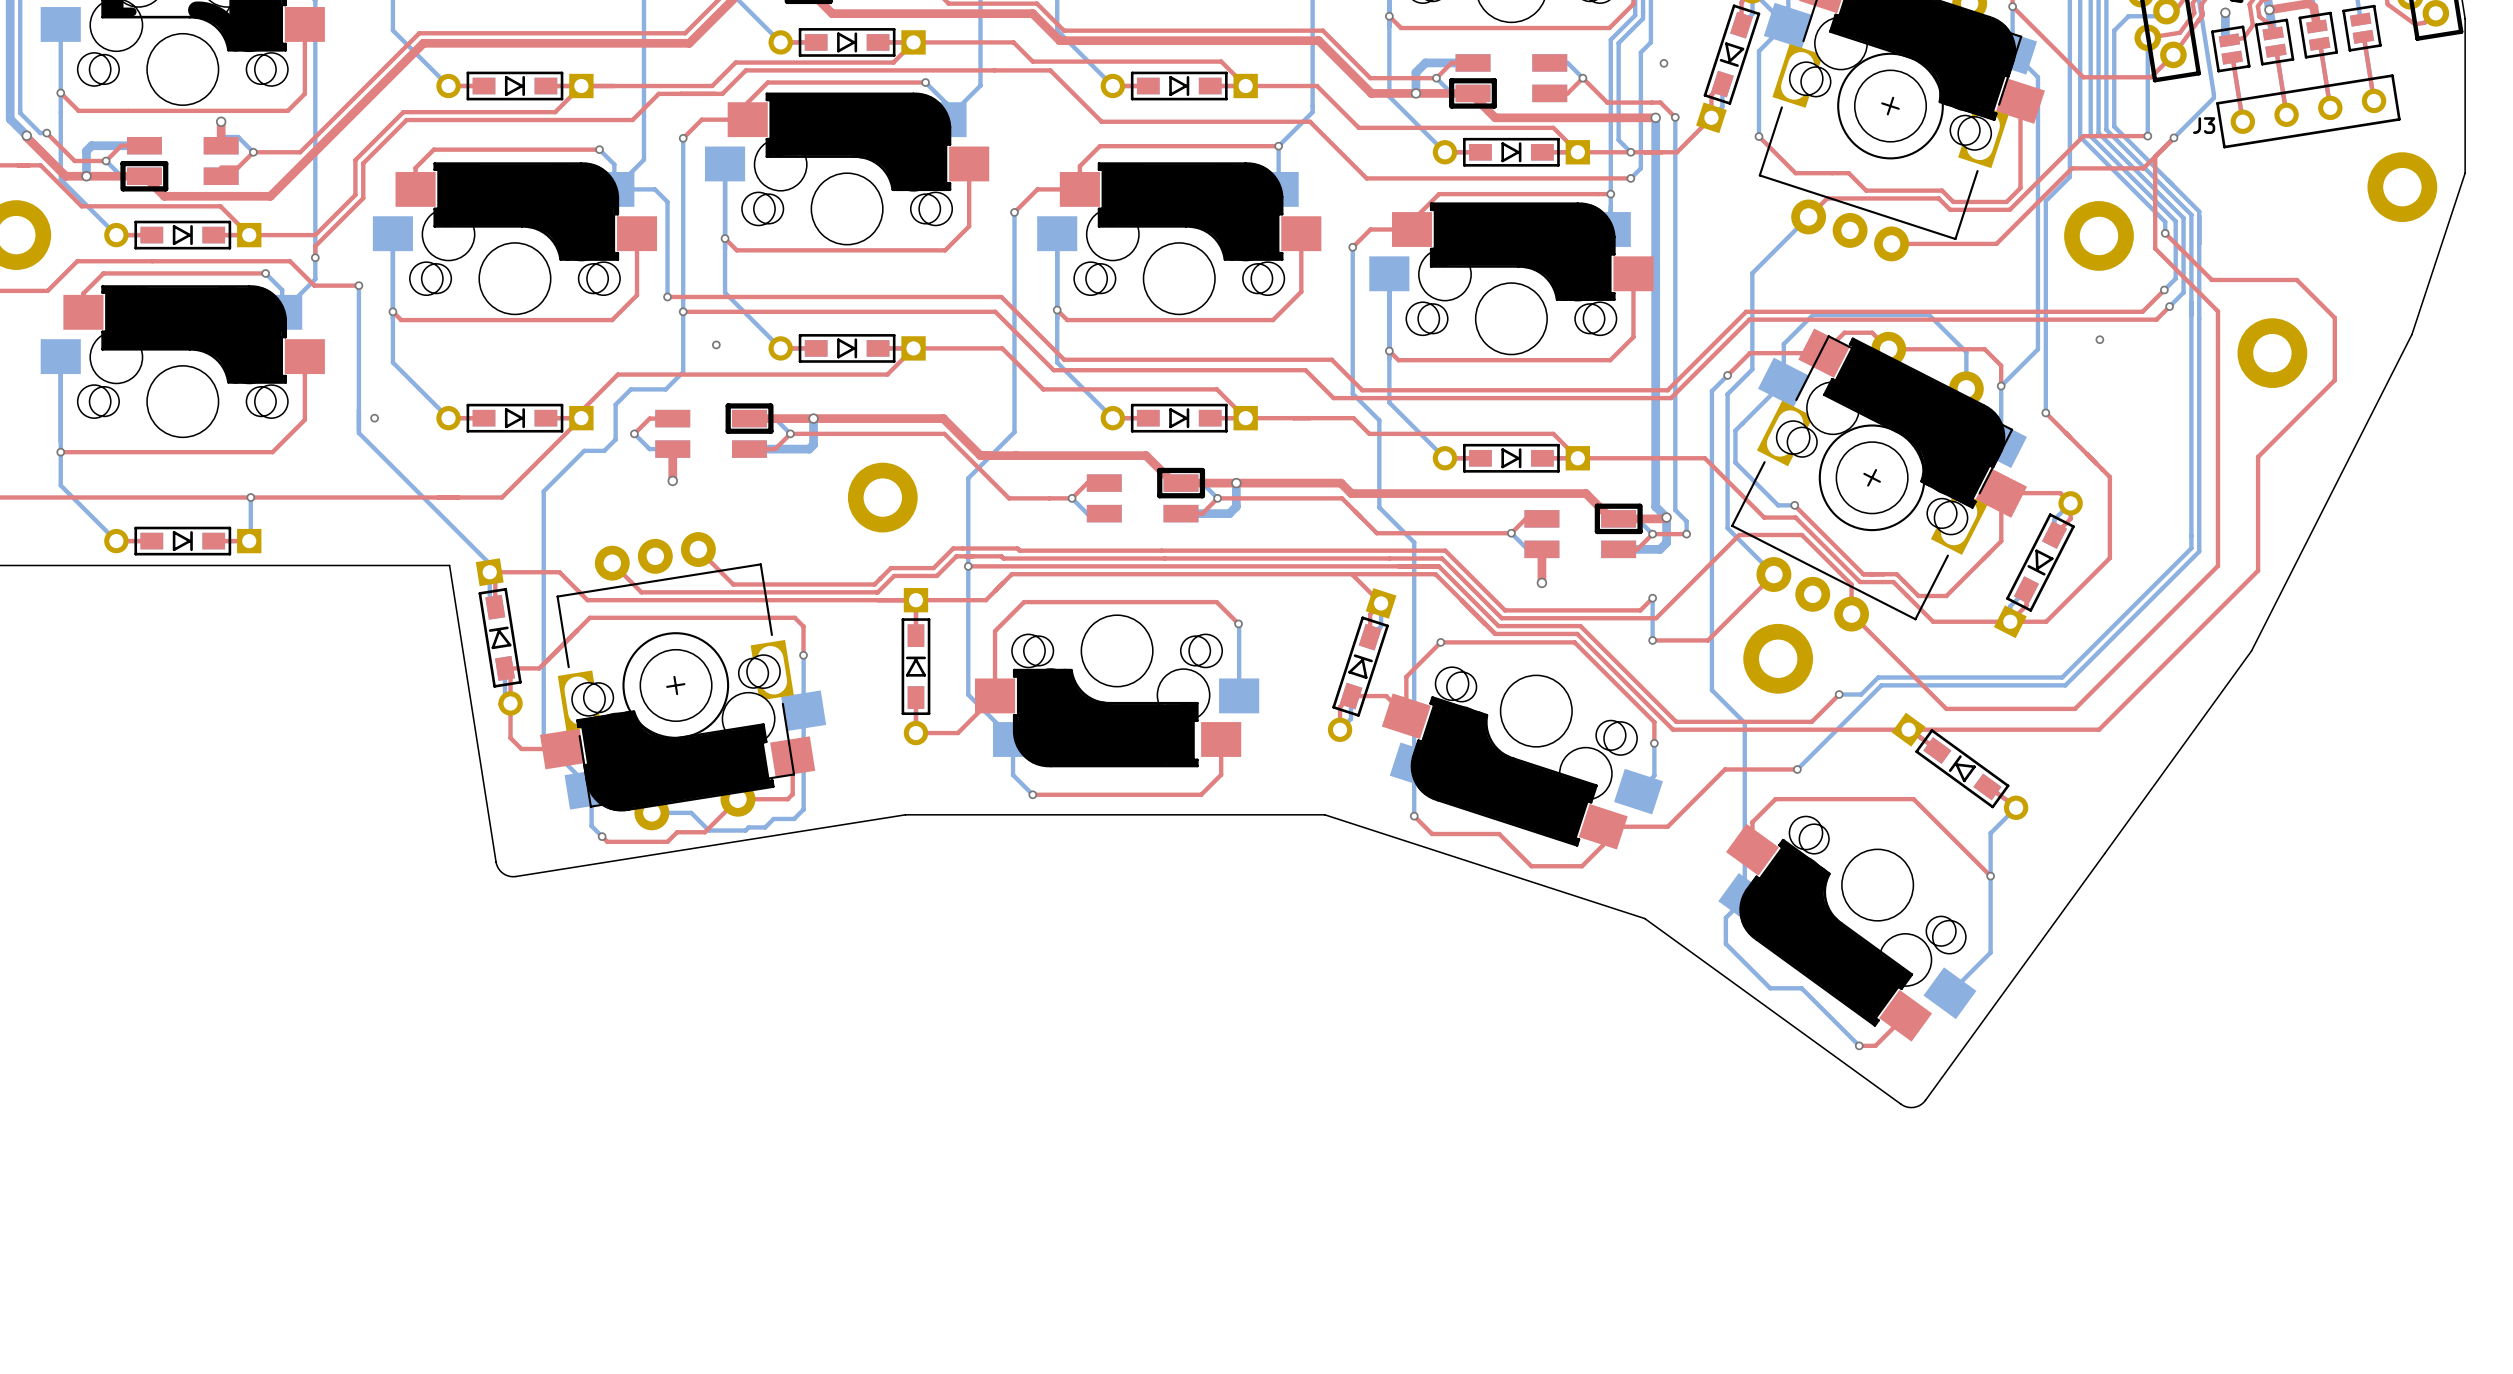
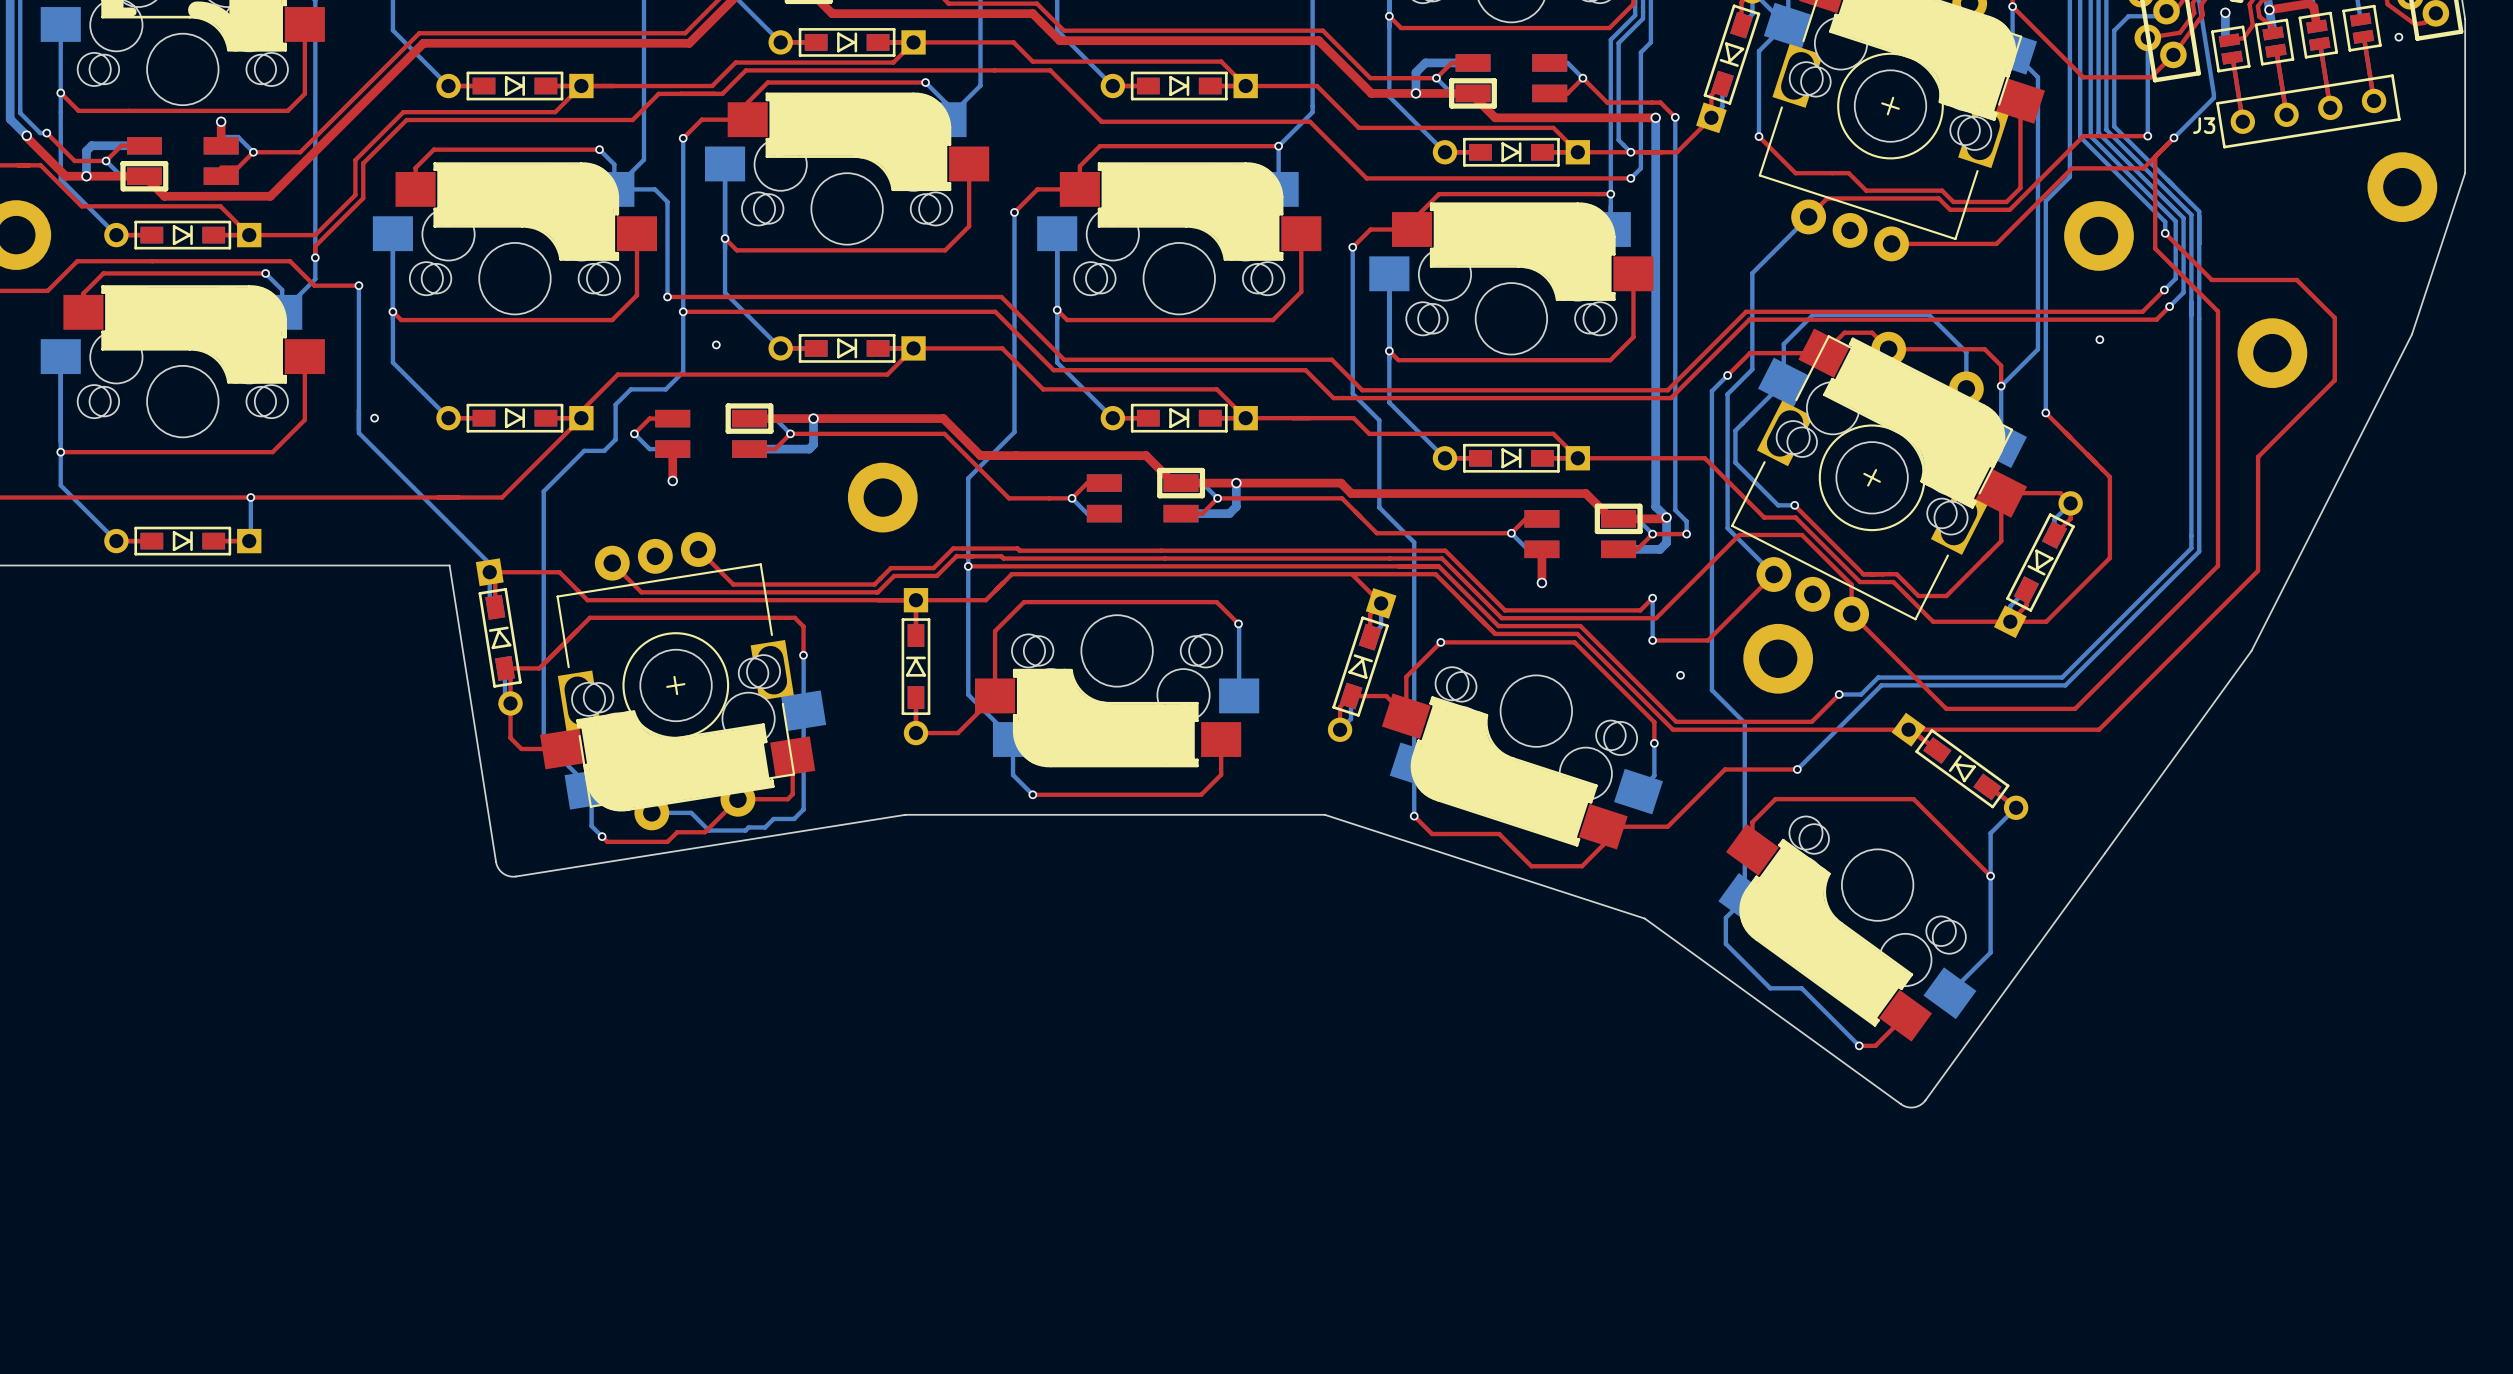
via: none -> (2398, 37)
via: (1663, 63) -> none
via: none -> (1680, 675)

